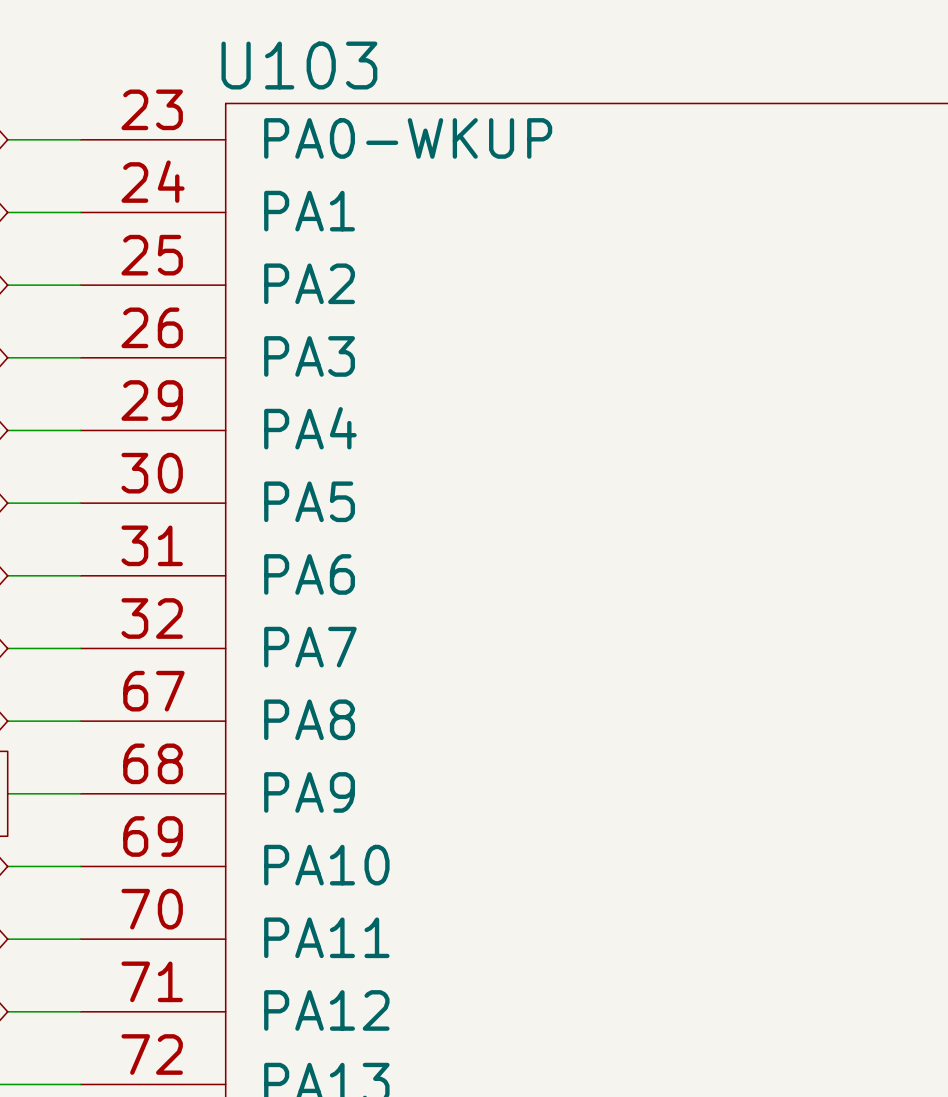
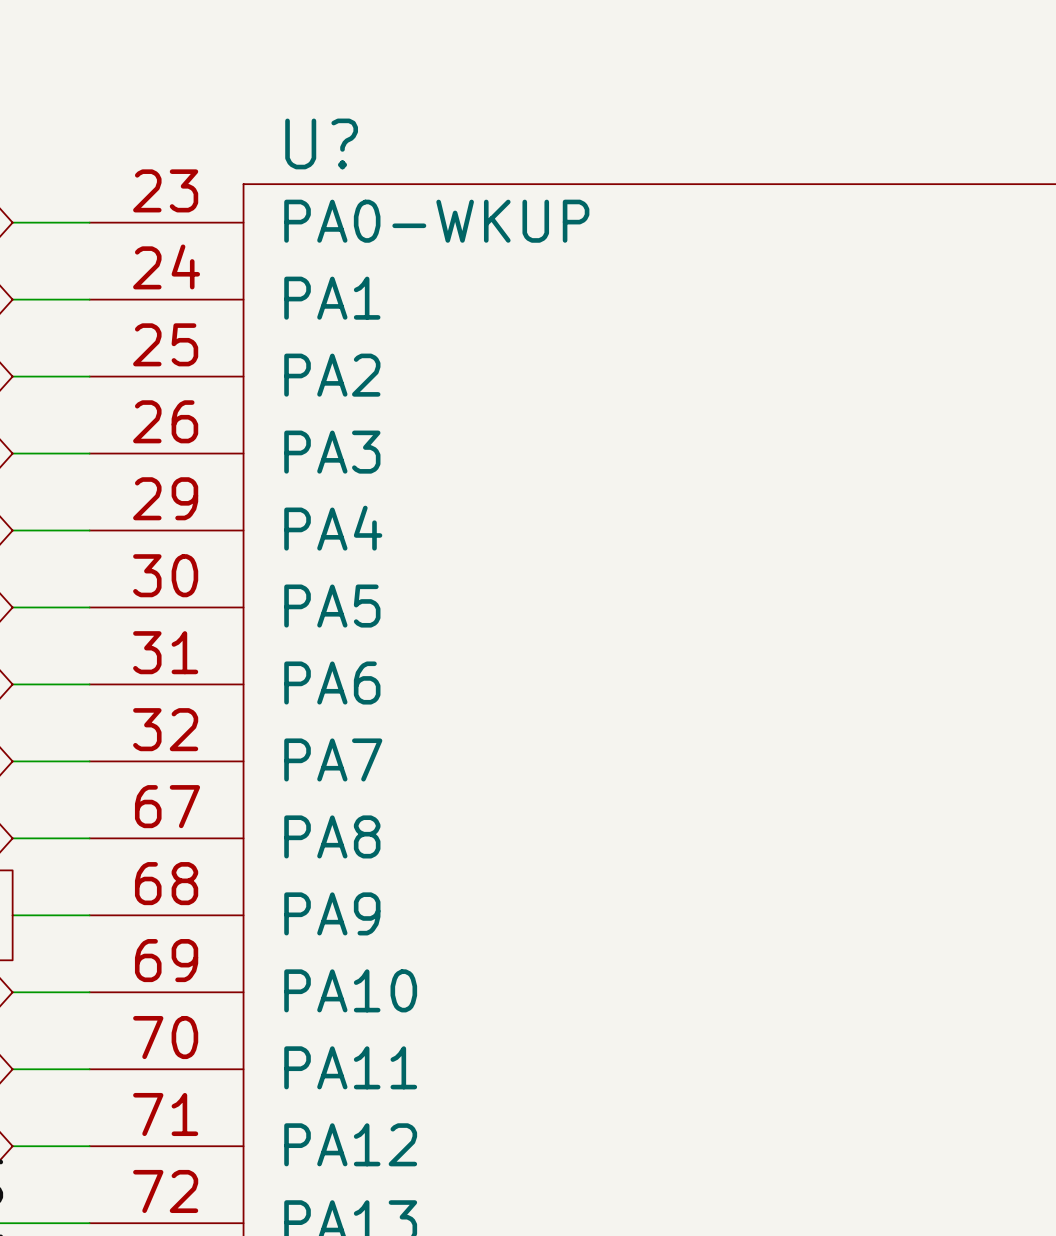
U103 name: U103 (299, 65) -> U? (321, 143)

